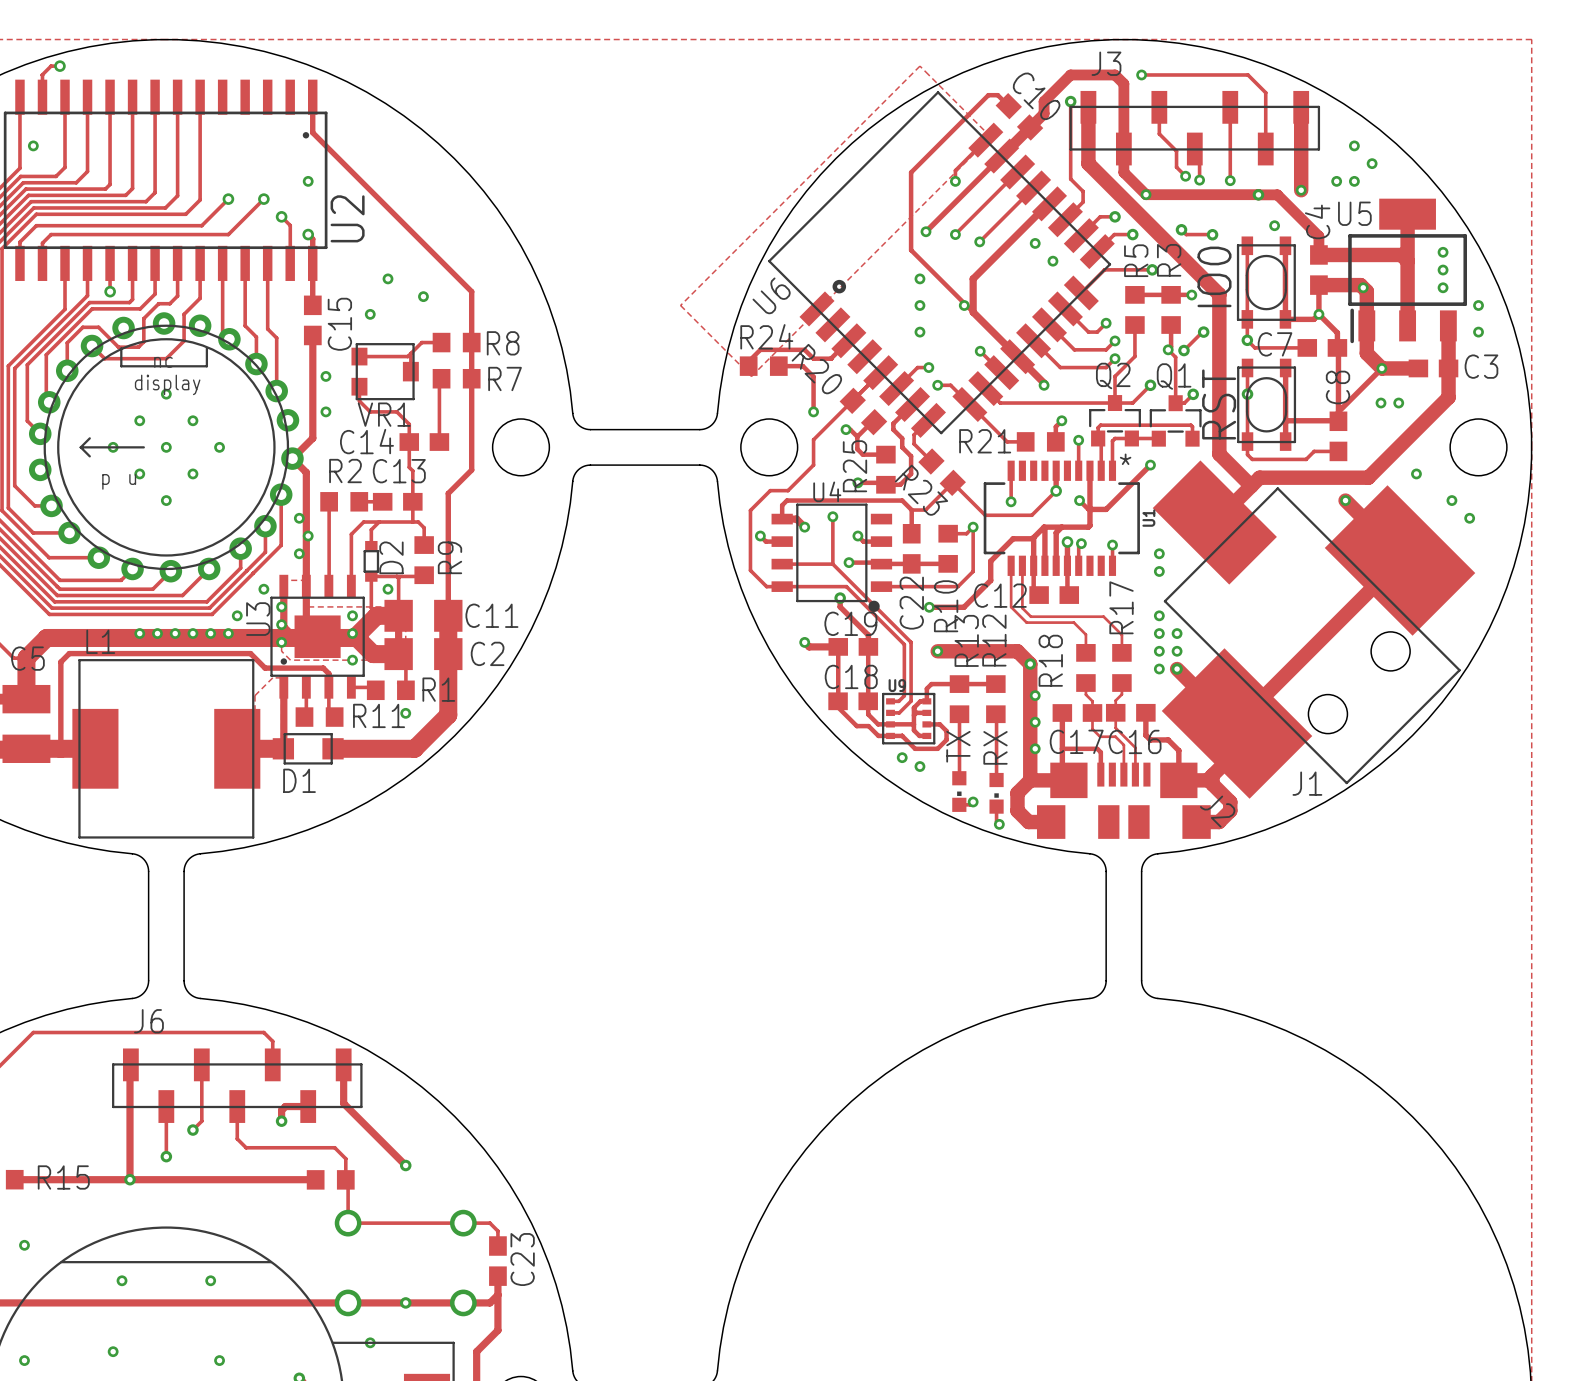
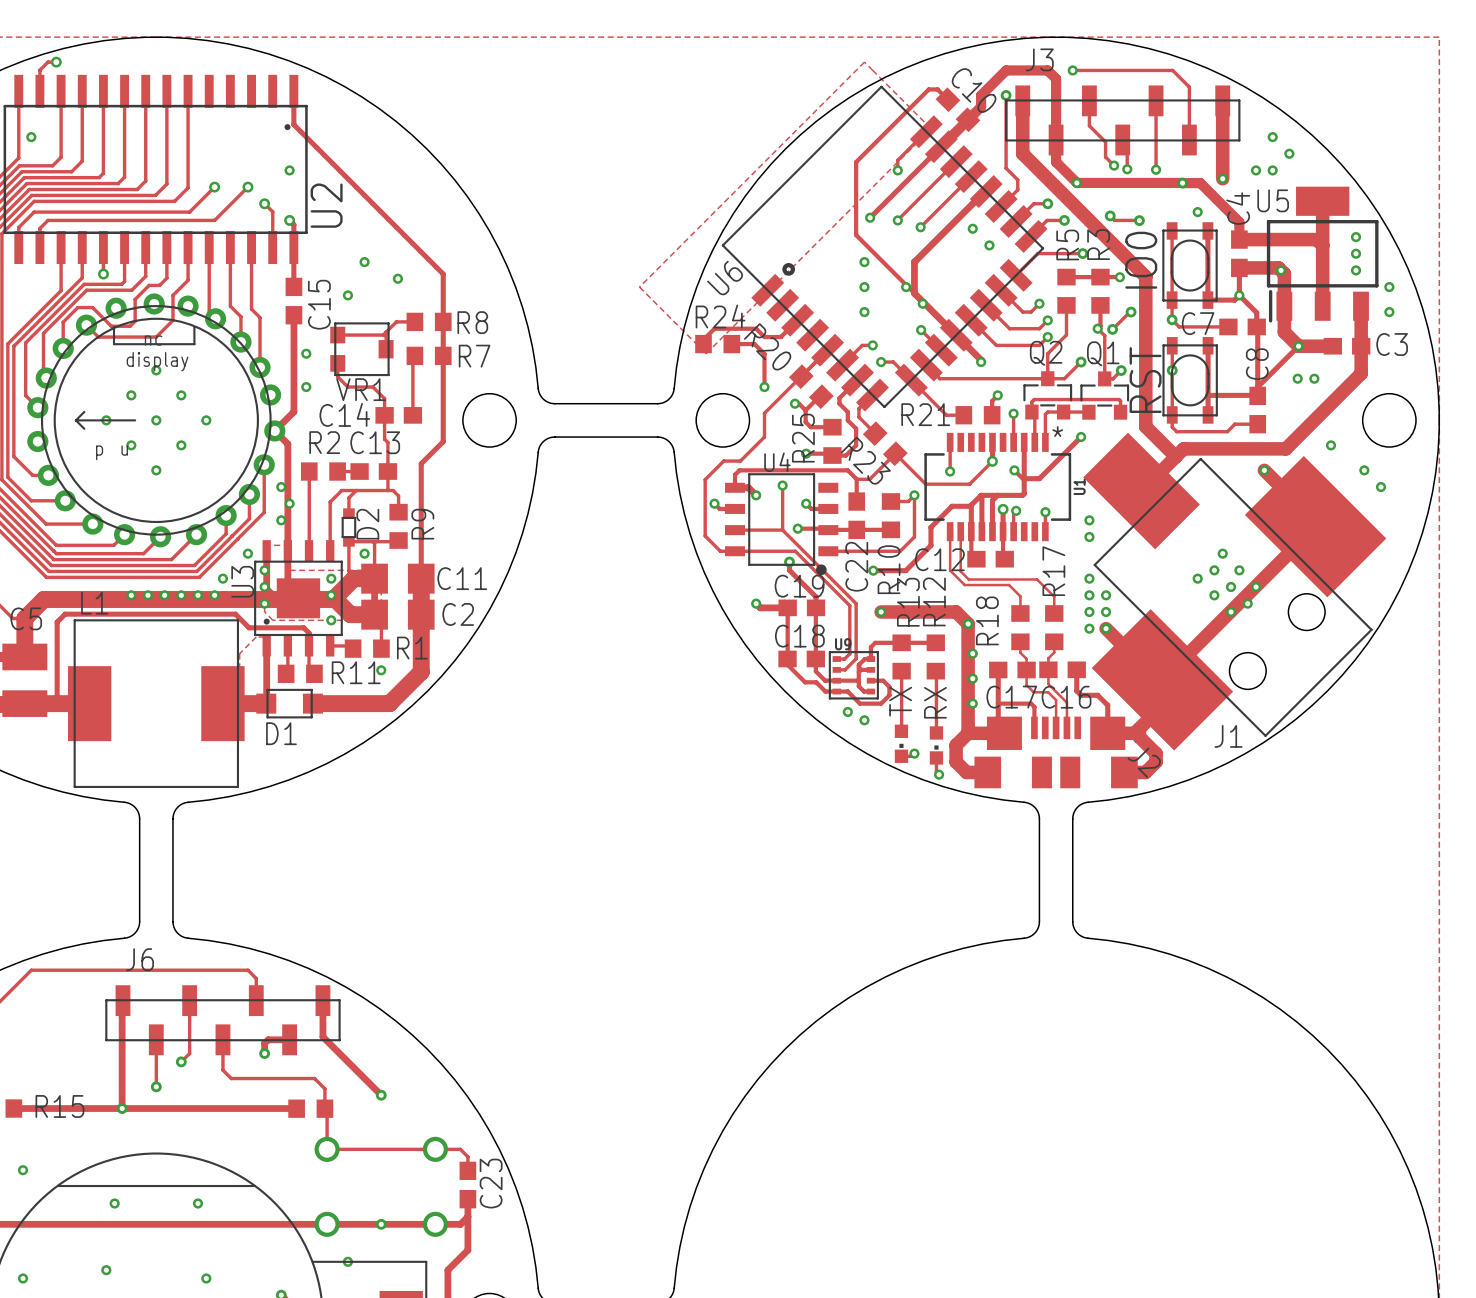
via: none -> (922, 303)
via: none -> (1222, 553)
via: none -> (1214, 570)
via: none -> (1239, 570)
via: none -> (1197, 578)
via: none -> (1231, 587)
via: none -> (1256, 587)
via: none -> (1214, 595)
via: none -> (1247, 603)
via: none -> (1231, 611)

